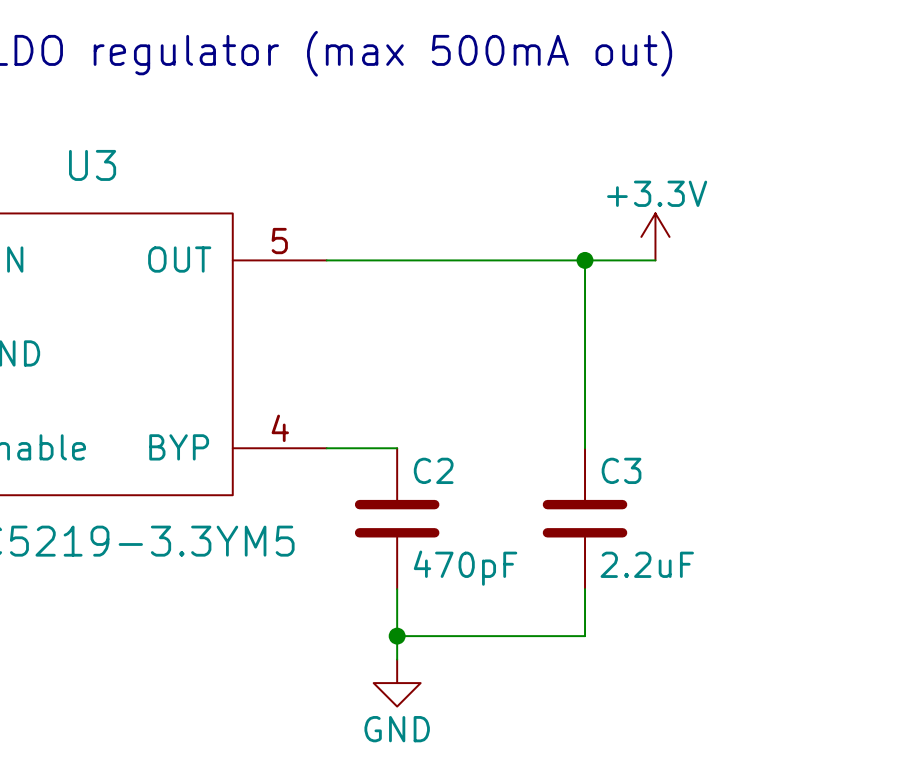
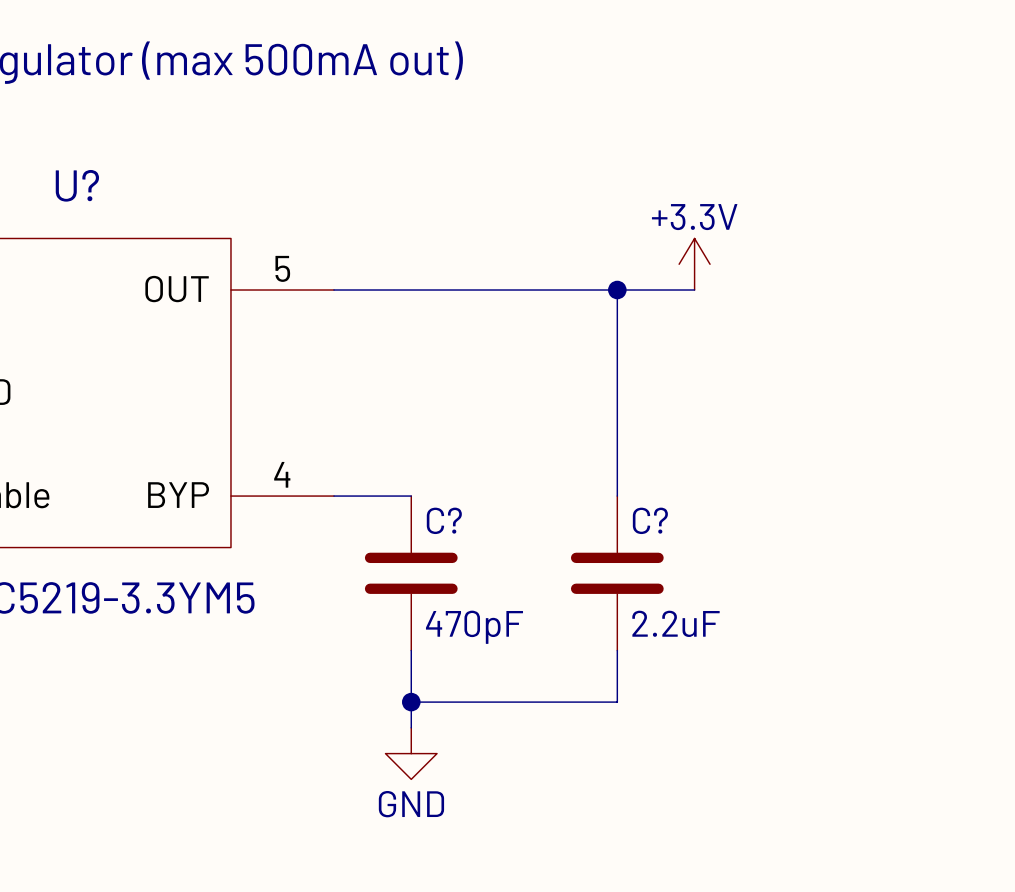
U3 name: U3 (92, 165) -> U? (77, 185)
C2 name: C2 (433, 470) -> C? (444, 520)
C3 name: C3 (621, 470) -> C? (650, 520)

